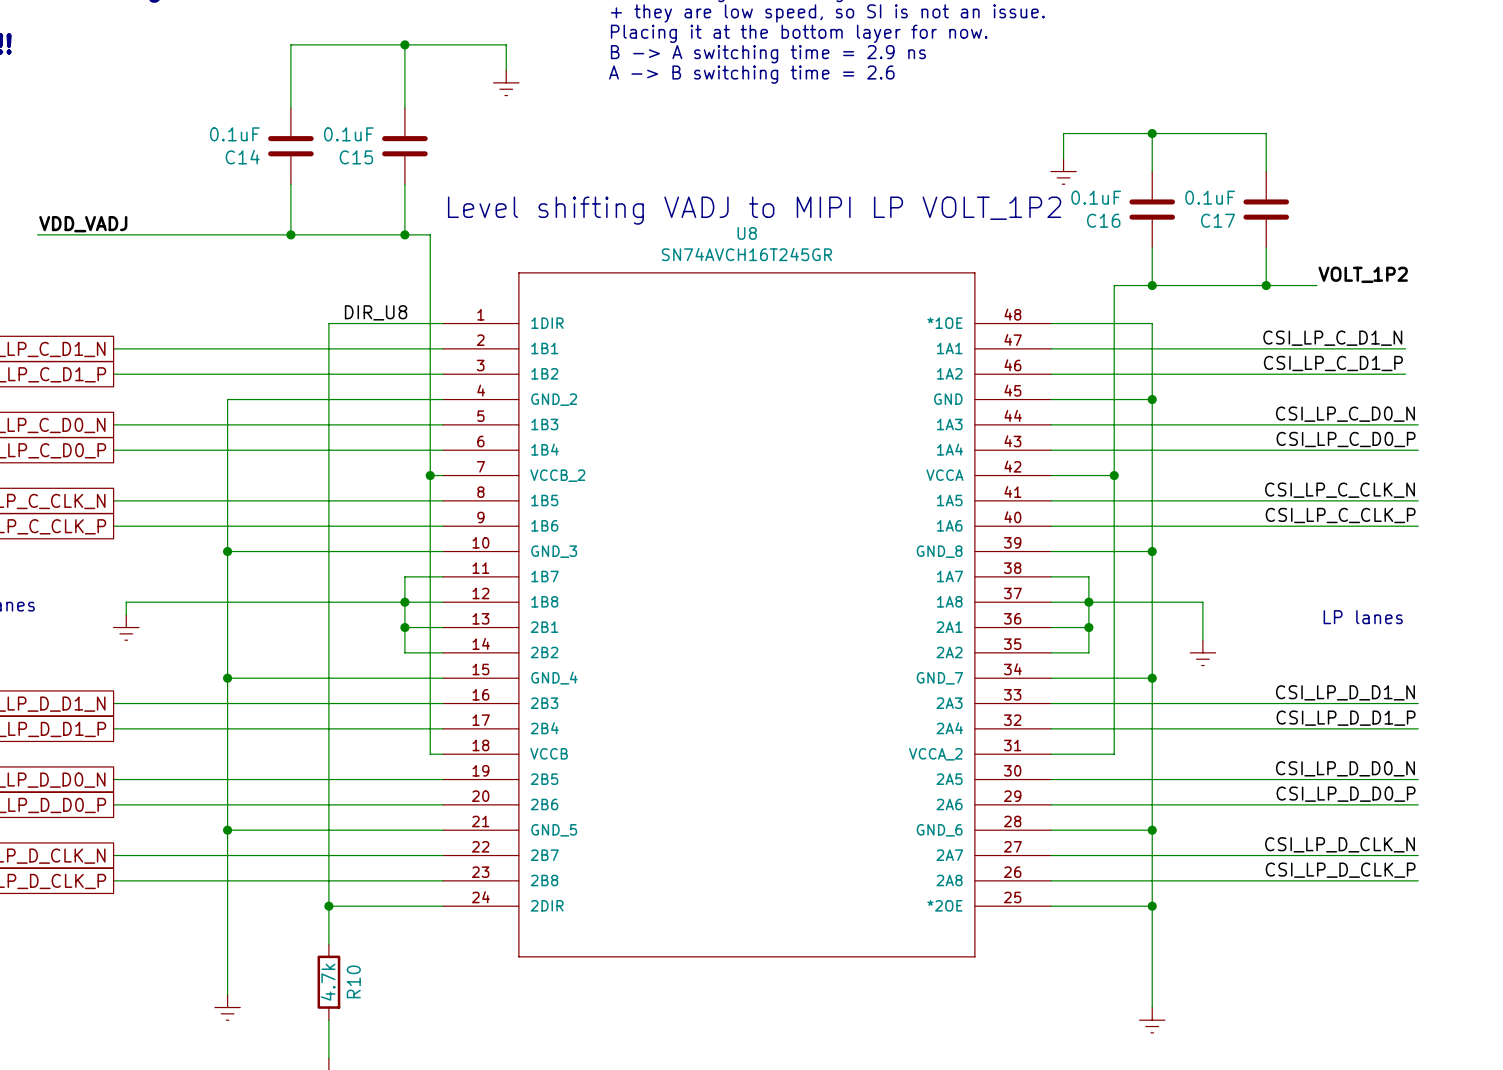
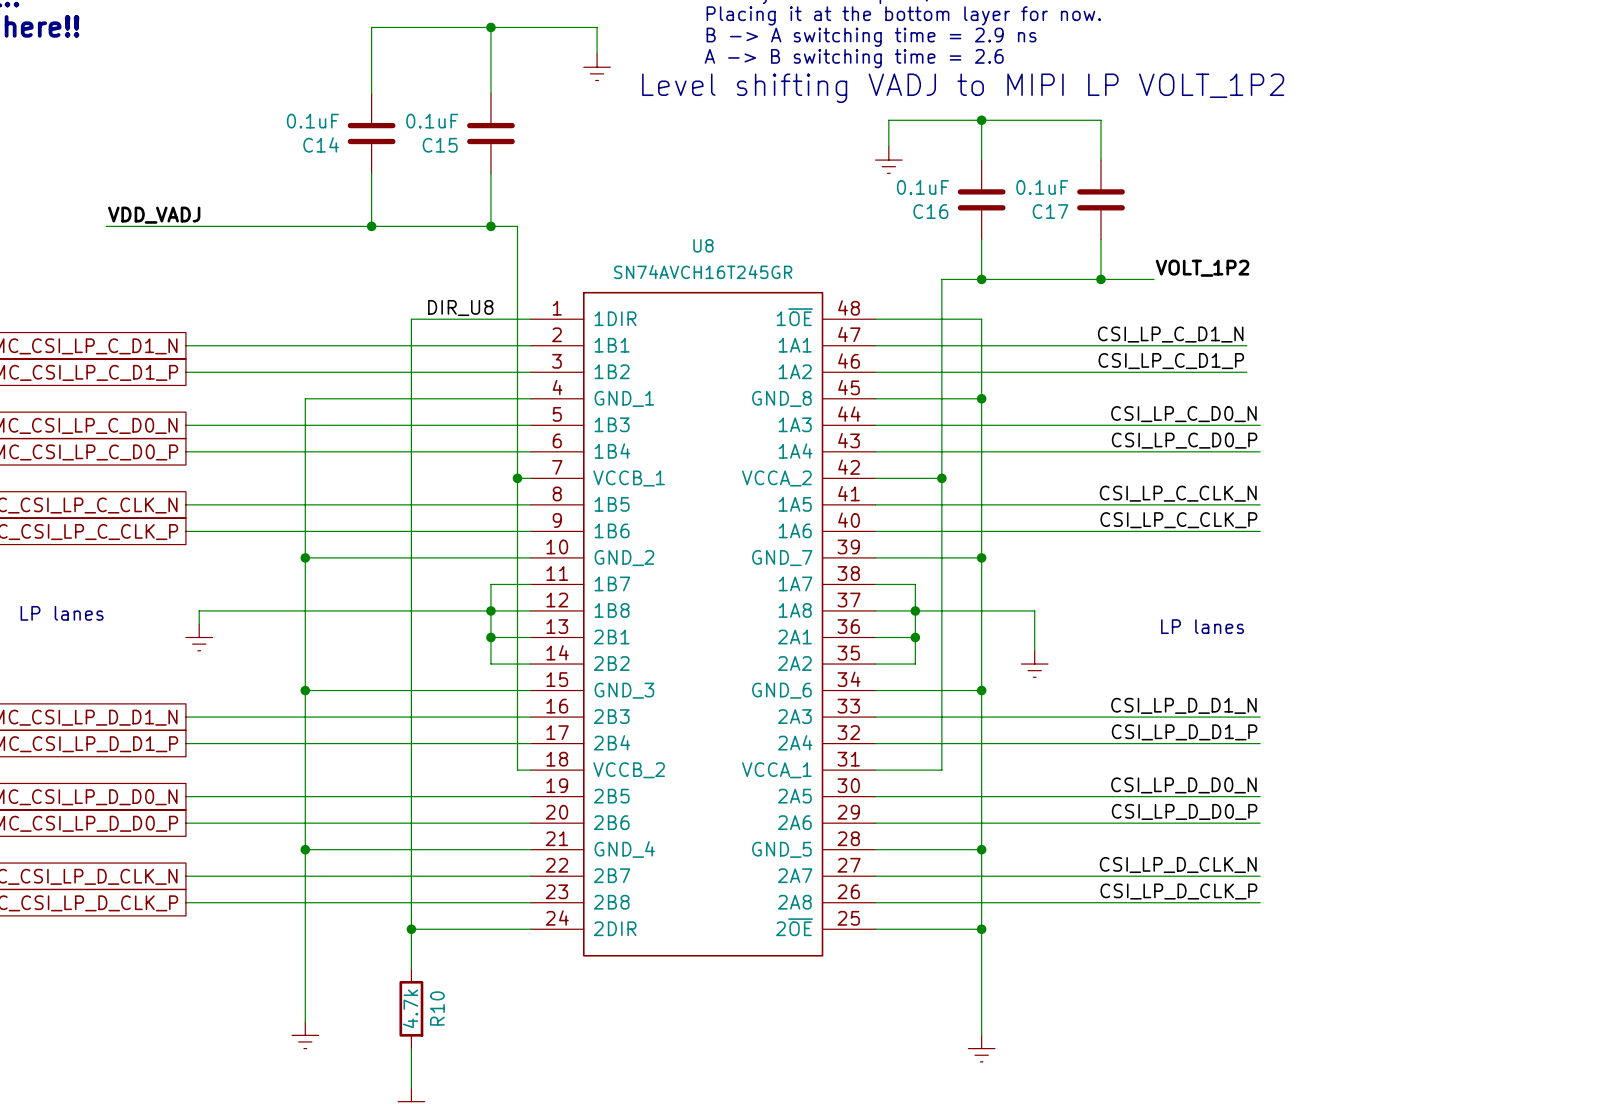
wire: none -> (981, 120) (981, 160)
junction: none -> (981, 120)
wire: (1152, 133) (1152, 171) -> none
junction: (1152, 133) -> none
wire: none -> (888, 146) (888, 120) (1101, 120) (1101, 160)
wire: (1063, 158) (1063, 133) (1266, 133) (1266, 171) -> none
power symbol: none -> (888, 160)
power symbol: (1063, 171) -> none
C16 position: (1152, 209) -> (981, 199)
C17 position: (1266, 209) -> (1101, 199)
text position: Level shifting VADJ to MIPI LP VOLT_1P2 (754, 210) -> Level shifting VADJ to MIPI LP VOLT_1P2 (963, 88)
U8 name position: U8 (747, 233) -> U8 (703, 245)
wire: none -> (981, 239) (981, 279)
wire: (1152, 247) (1152, 285) -> (1101, 239) (1101, 279)
wire: (1266, 247) (1266, 285) -> none
U8 value position: SN74AVCH16T245GR (746, 254) -> SN74AVCH16T245GR (703, 272)
U8 symbol: [442, 272, 1051, 957] -> [530, 291, 876, 957]
label: none -> VOLT_1P2 (1202, 268)
label: VOLT_1P2 (1363, 274) -> none
junction: none -> (981, 279)
junction: none -> (1101, 279)
wire: none -> (1154, 279) (941, 279) (941, 770) (875, 770)
junction: (1152, 285) -> none
junction: (1266, 285) -> none
wire: (1316, 285) (1114, 285) (1114, 754) (1050, 754) -> none
wire: none -> (875, 319) (981, 319) (981, 1035)
wire: (1050, 323) (1152, 323) (1152, 1007) -> none
label: none -> CSI_LP_C_D1_N (1170, 334)
label: CSI_LP_C_D1_N (1332, 338) -> none
wire: none -> (875, 345) (1167, 345)
wire: (1126, 348) (1405, 348) -> none
label: none -> CSI_LP_C_D1_P (1171, 361)
label: CSI_LP_C_D1_P (1333, 363) -> none
wire: none -> (875, 372) (1167, 372)
wire: (1126, 374) (1405, 374) -> none
wire: none -> (875, 398) (981, 398)
junction: none -> (981, 398)
wire: (1050, 399) (1152, 399) -> none
junction: (1152, 399) -> none
label: none -> CSI_LP_C_D0_N (1183, 414)
label: CSI_LP_C_D0_N (1345, 414) -> none
wire: none -> (875, 425) (1167, 425)
wire: (1139, 424) (1418, 424) -> none
label: none -> CSI_LP_C_D0_P (1184, 440)
label: CSI_LP_C_D0_P (1346, 439) -> none
wire: none -> (875, 451) (1167, 451)
wire: (1139, 450) (1418, 450) -> none
wire: none -> (875, 478) (941, 478)
junction: none -> (941, 478)
wire: (1050, 475) (1114, 475) -> none
junction: (1114, 475) -> none
label: none -> CSI_LP_C_CLK_N (1178, 493)
label: CSI_LP_C_CLK_N (1340, 490) -> none
wire: none -> (875, 504) (1167, 504)
wire: (1139, 500) (1418, 500) -> none
label: none -> CSI_LP_C_CLK_P (1178, 520)
label: CSI_LP_C_CLK_P (1340, 515) -> none
wire: none -> (875, 531) (1167, 531)
wire: (1139, 526) (1418, 526) -> none
wire: none -> (875, 557) (981, 557)
junction: none -> (981, 557)
wire: (1050, 551) (1152, 551) -> none
junction: (1152, 551) -> none
wire: none -> (875, 584) (915, 584) (915, 664) (875, 664)
wire: (1050, 576) (1088, 576) (1088, 652) (1050, 652) -> none
wire: none -> (875, 610) (1034, 610) (1034, 650)
junction: none -> (915, 610)
wire: (1050, 602) (1202, 602) (1202, 640) -> none
junction: (1088, 602) -> none
text: none -> LP lanes (1202, 626)
text: LP lanes (1363, 617) -> none
wire: none -> (875, 637) (915, 637)
junction: none -> (915, 637)
wire: (1050, 627) (1088, 627) -> none
junction: (1088, 627) -> none
power symbol: none -> (1034, 664)
power symbol: (1202, 652) -> none
wire: none -> (875, 690) (981, 690)
junction: none -> (981, 690)
wire: (1050, 678) (1152, 678) -> none
junction: (1152, 678) -> none
label: none -> CSI_LP_D_D1_N (1183, 705)
label: CSI_LP_D_D1_N (1345, 692) -> none
wire: none -> (875, 717) (1167, 717)
wire: (1139, 703) (1418, 703) -> none
label: none -> CSI_LP_D_D1_P (1184, 732)
label: CSI_LP_D_D1_P (1346, 718) -> none
wire: none -> (875, 743) (1167, 743)
wire: (1139, 728) (1418, 728) -> none
label: none -> CSI_LP_D_D0_N (1183, 785)
label: CSI_LP_D_D0_N (1345, 768) -> none
wire: none -> (875, 796) (1167, 796)
wire: (1139, 779) (1418, 779) -> none
label: none -> CSI_LP_D_D0_P (1184, 811)
label: CSI_LP_D_D0_P (1346, 794) -> none
wire: none -> (875, 823) (1167, 823)
wire: (1139, 804) (1418, 804) -> none
wire: none -> (875, 849) (981, 849)
junction: none -> (981, 849)
wire: (1050, 830) (1152, 830) -> none
junction: (1152, 830) -> none
label: none -> CSI_LP_D_CLK_N (1178, 865)
label: CSI_LP_D_CLK_N (1340, 844) -> none
wire: none -> (875, 876) (1167, 876)
wire: (1139, 855) (1418, 855) -> none
label: none -> CSI_LP_D_CLK_P (1178, 891)
label: CSI_LP_D_CLK_P (1340, 870) -> none
wire: none -> (875, 902) (1167, 902)
wire: (1139, 880) (1418, 880) -> none
wire: none -> (875, 929) (981, 929)
junction: none -> (981, 929)
wire: (1050, 906) (1152, 906) -> none
junction: (1152, 906) -> none
power symbol: none -> (981, 1048)
power symbol: (1152, 1020) -> none

